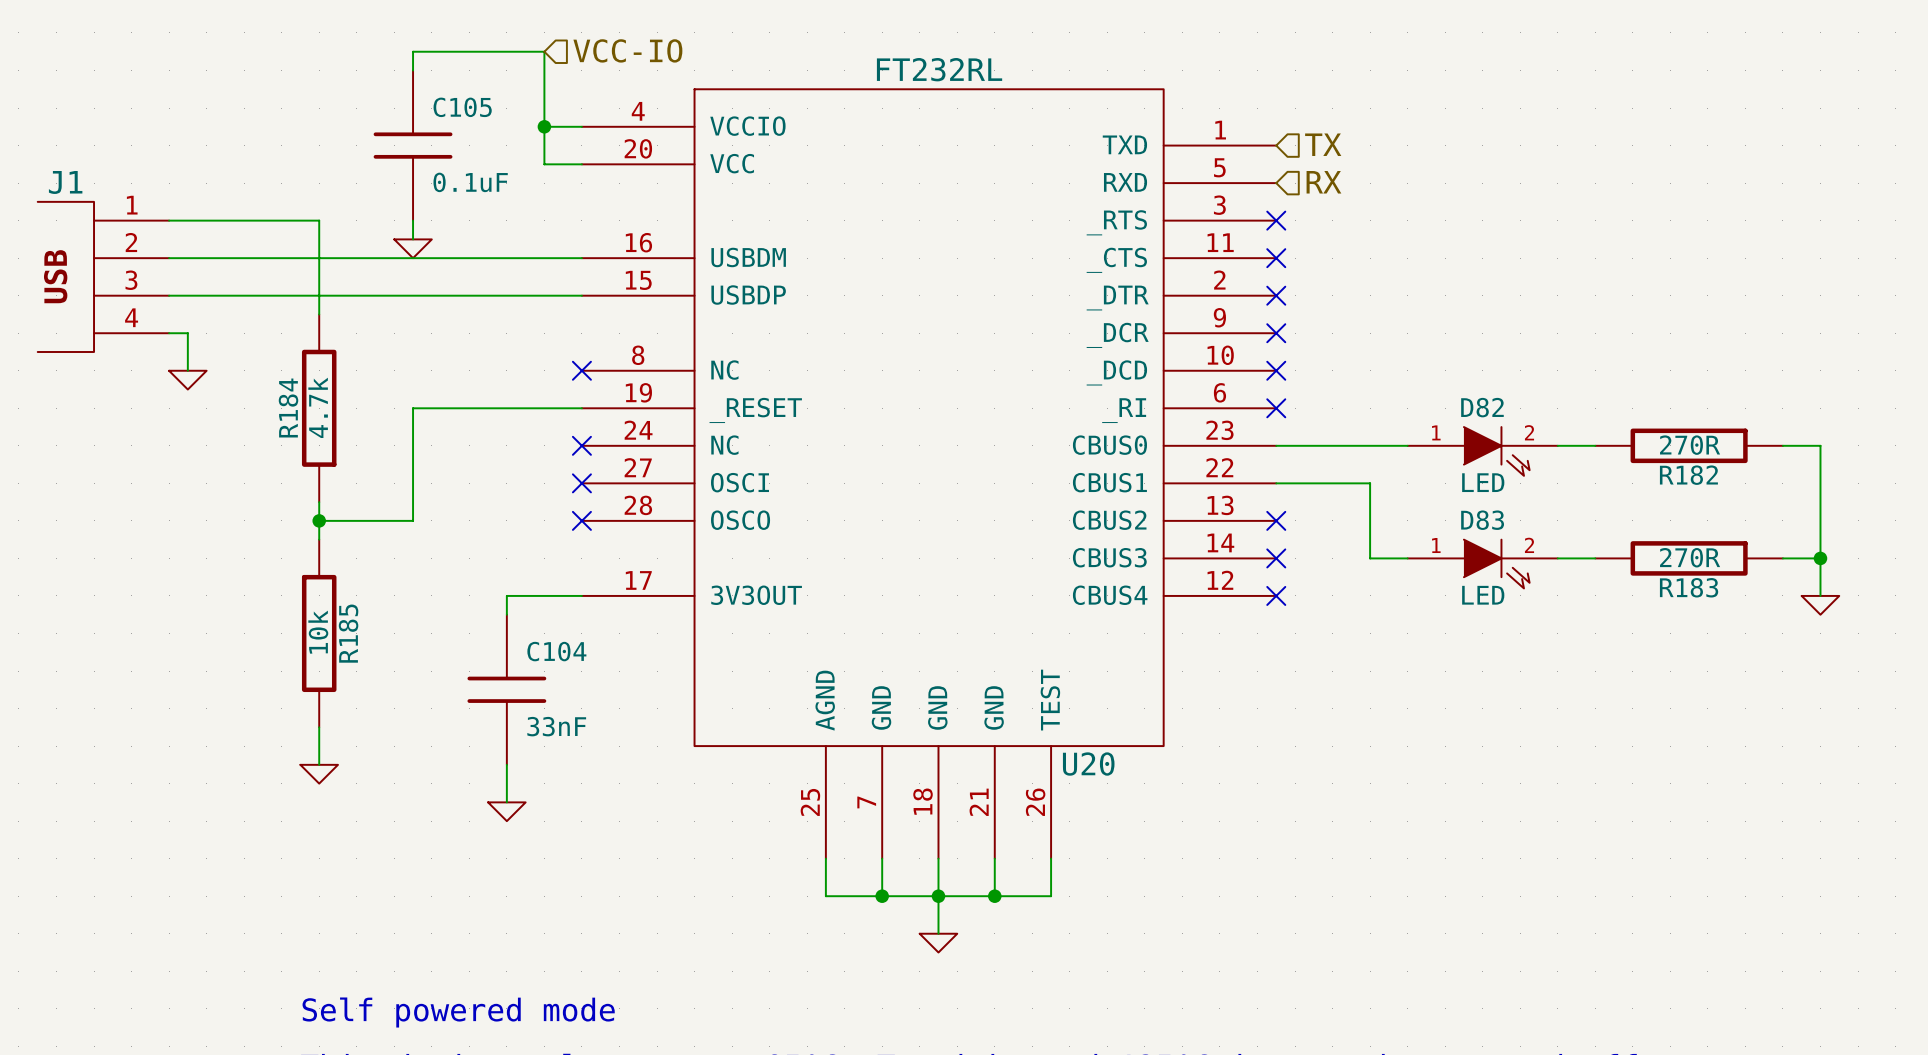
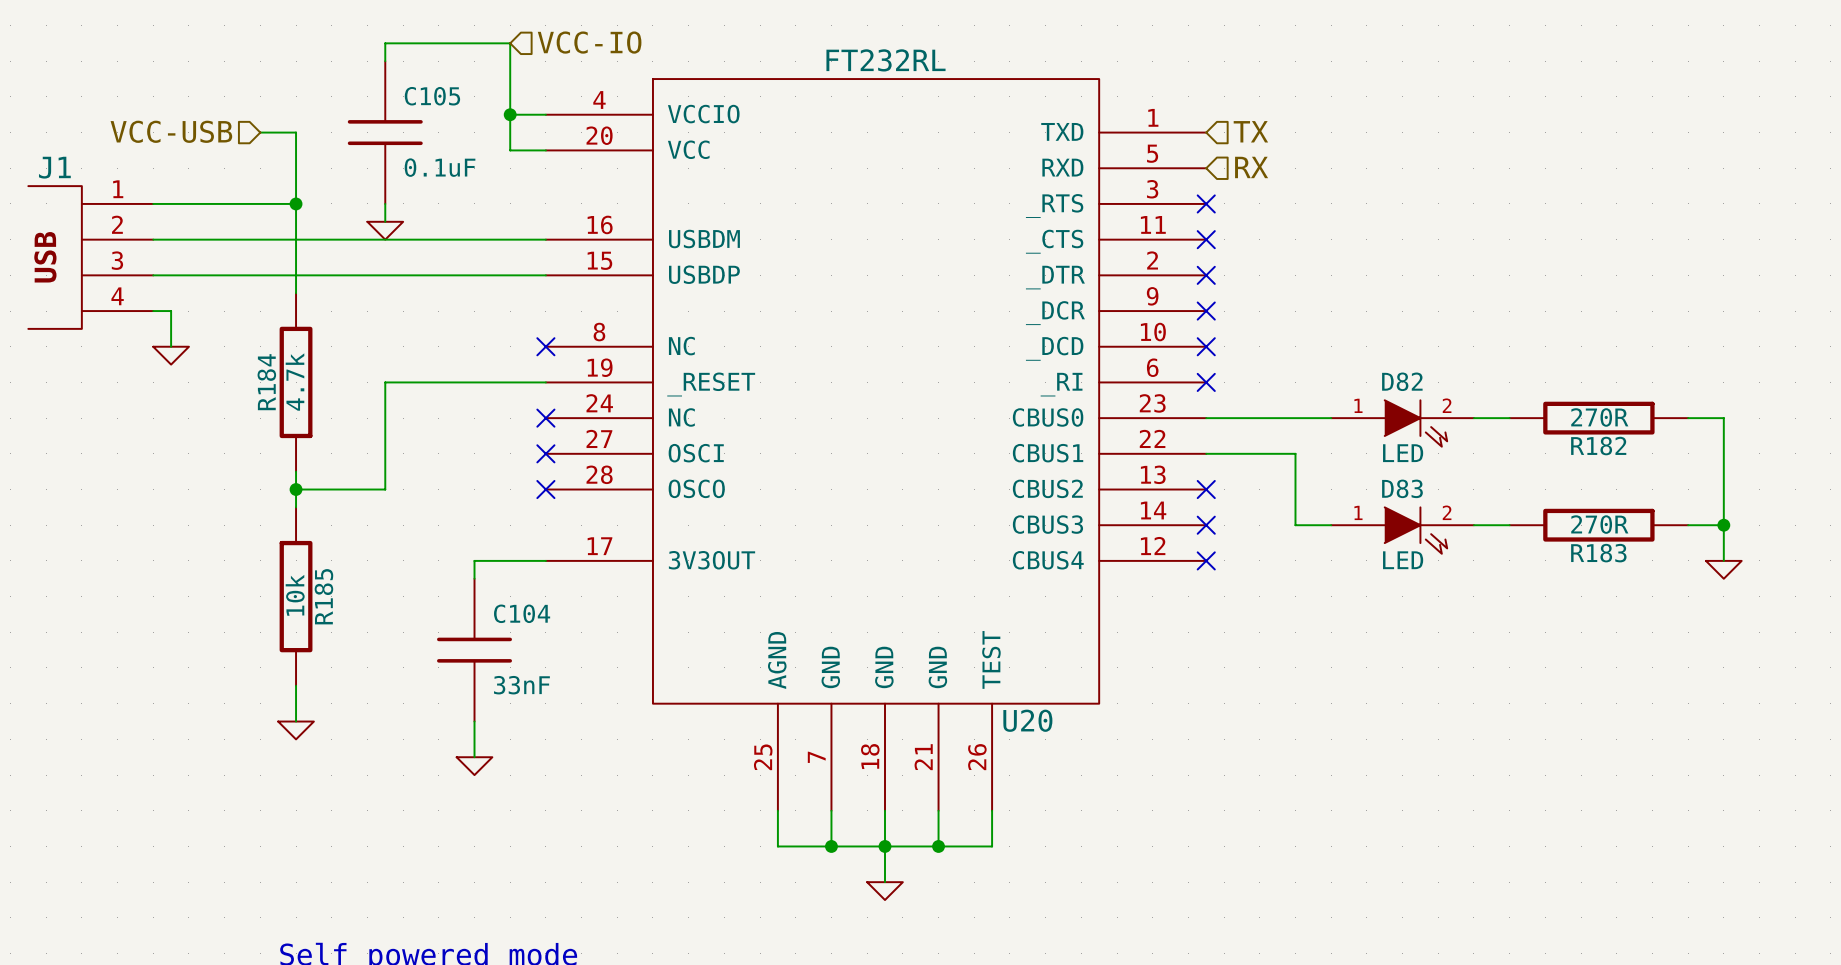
hierarchical label: none -> VCC-USB (171, 131)
wire: none -> (260, 132) (296, 132) (296, 203)
junction: none -> (296, 203)

